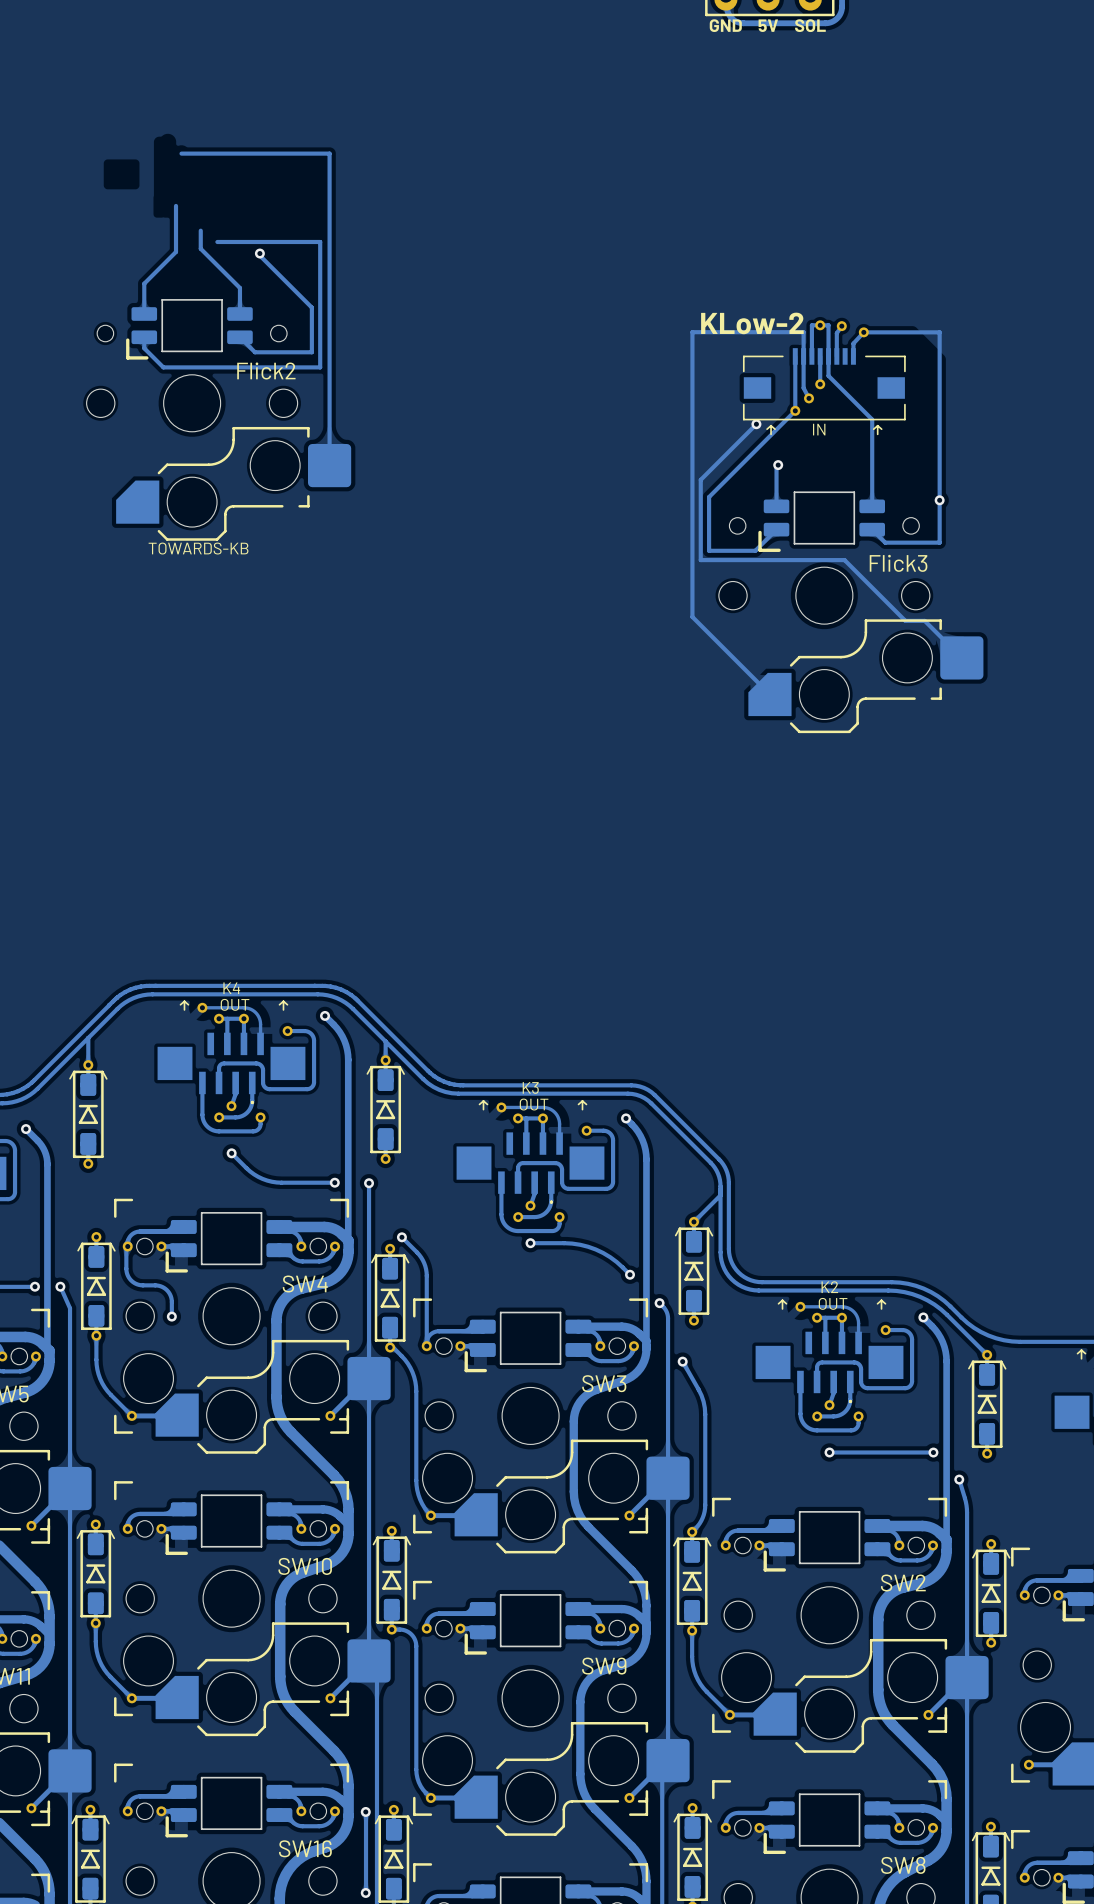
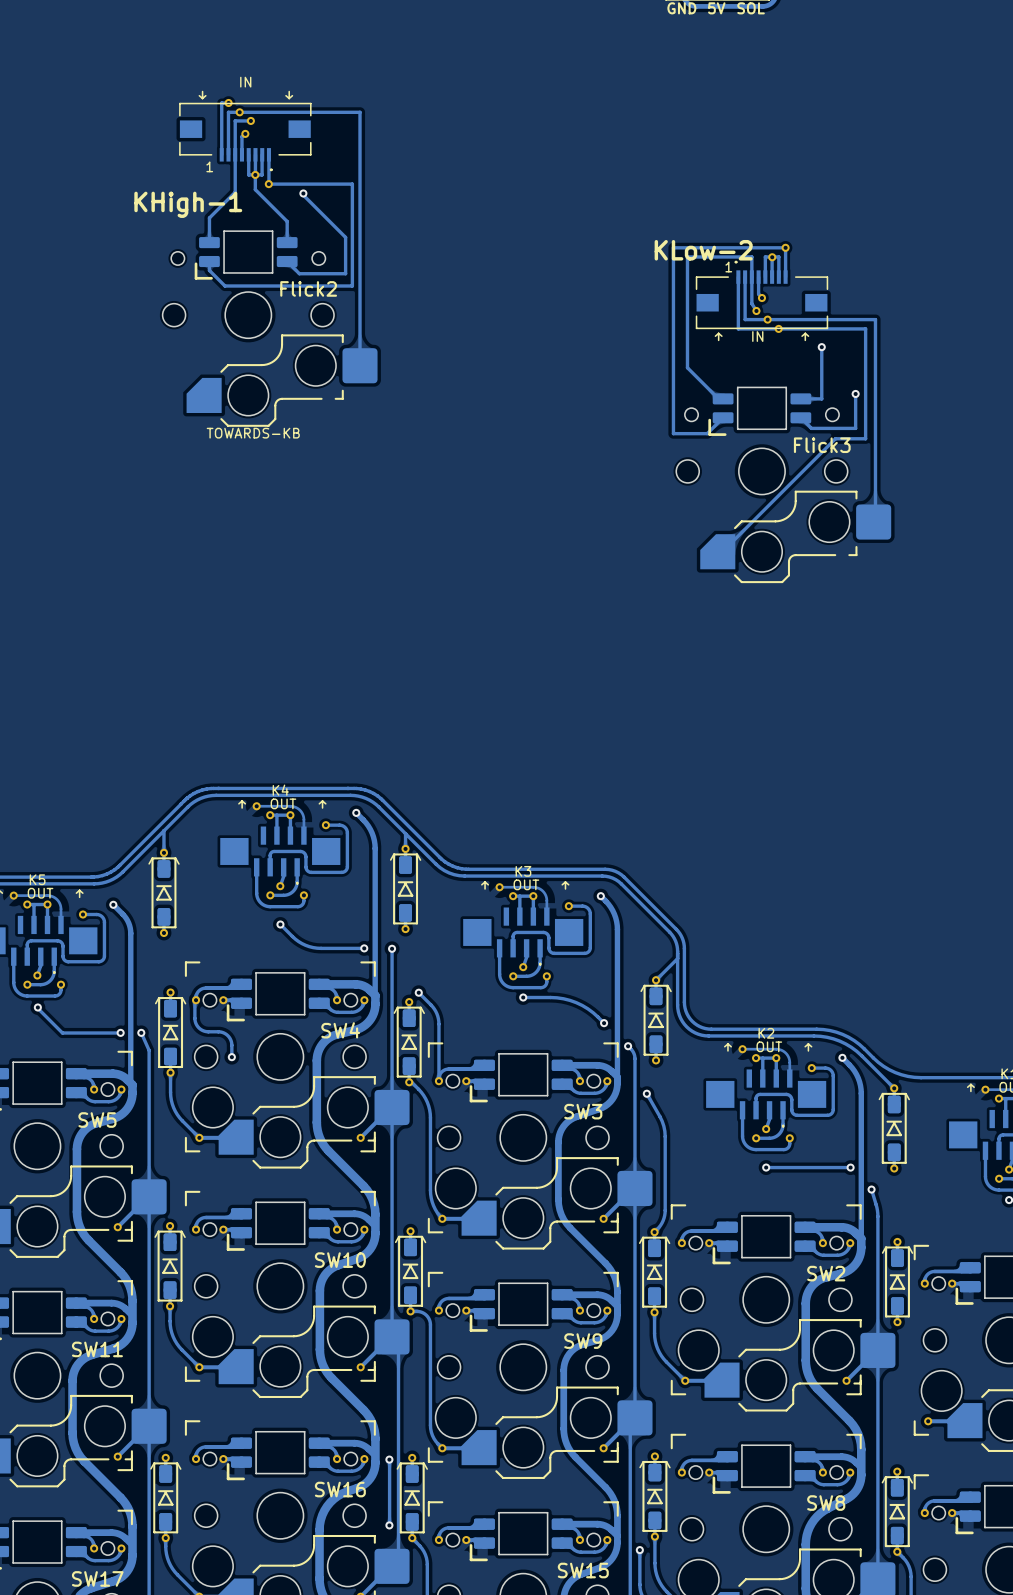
KHigh-1: none -> (245, 139)
KLow-2 footprint: [742, 320, 906, 436] -> [695, 243, 829, 342]
track: (863, 332) (939, 332) (939, 500) -> none
track: (803, 356) (803, 332) (692, 332) (692, 616) (769, 694) -> (778, 328) (865, 328) (865, 438) (835, 438) (722, 551) (717, 551)
track: (828, 356) (828, 375) (872, 419) (872, 506) -> (821, 347) (821, 398) (800, 398)
track: (795, 410) (709, 497) (709, 550) (755, 550) (757, 549) -> (785, 247) (673, 247) (673, 433) (707, 433)
track: (756, 424) (700, 479) (700, 560) (844, 560) (905, 620) (924, 620) (961, 657) -> (767, 319) (875, 319) (875, 520) (873, 522)
via: (756, 424) -> none
via: none -> (821, 347)
track: (778, 465) (776, 466) (776, 506) -> (751, 277) (751, 256) (687, 256) (687, 367) (718, 398) (723, 398)
via: (778, 465) -> none

